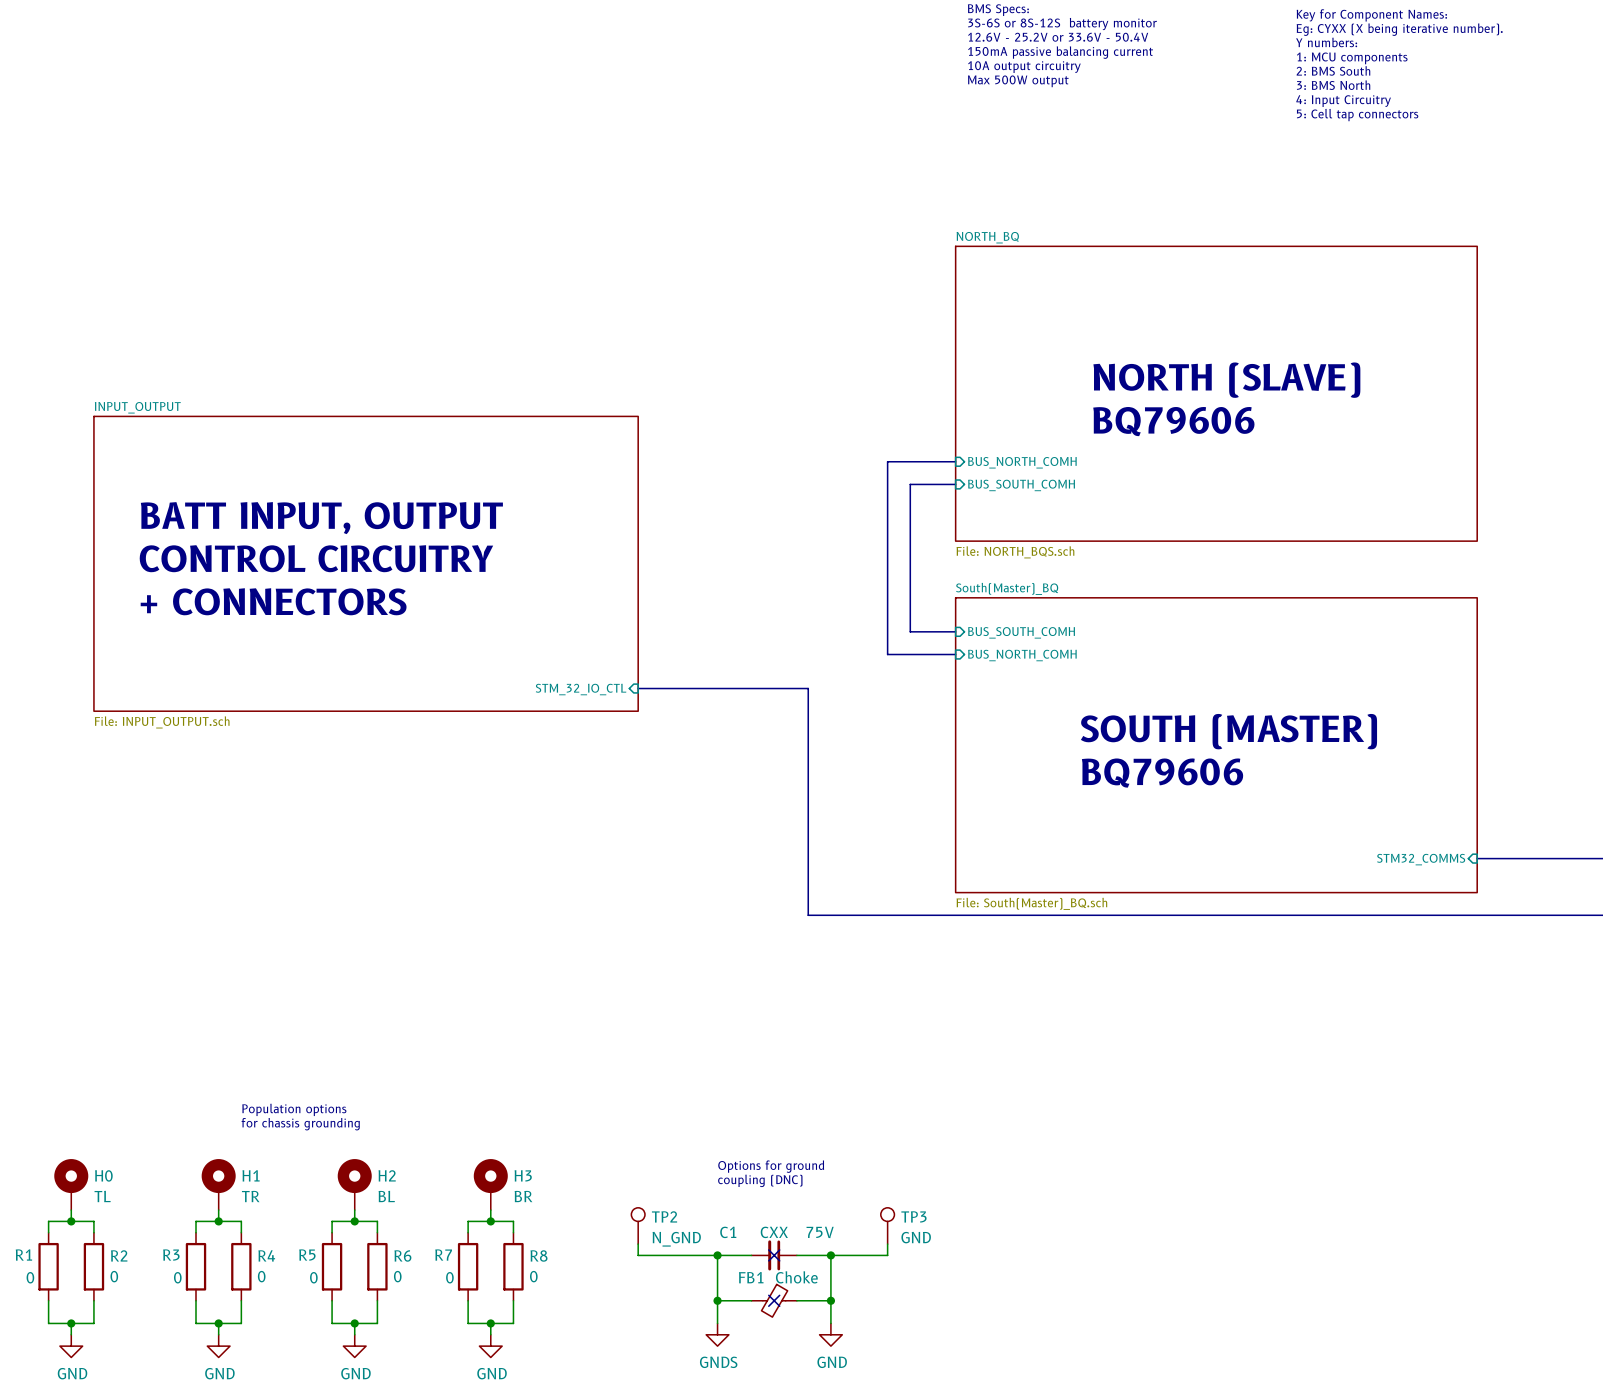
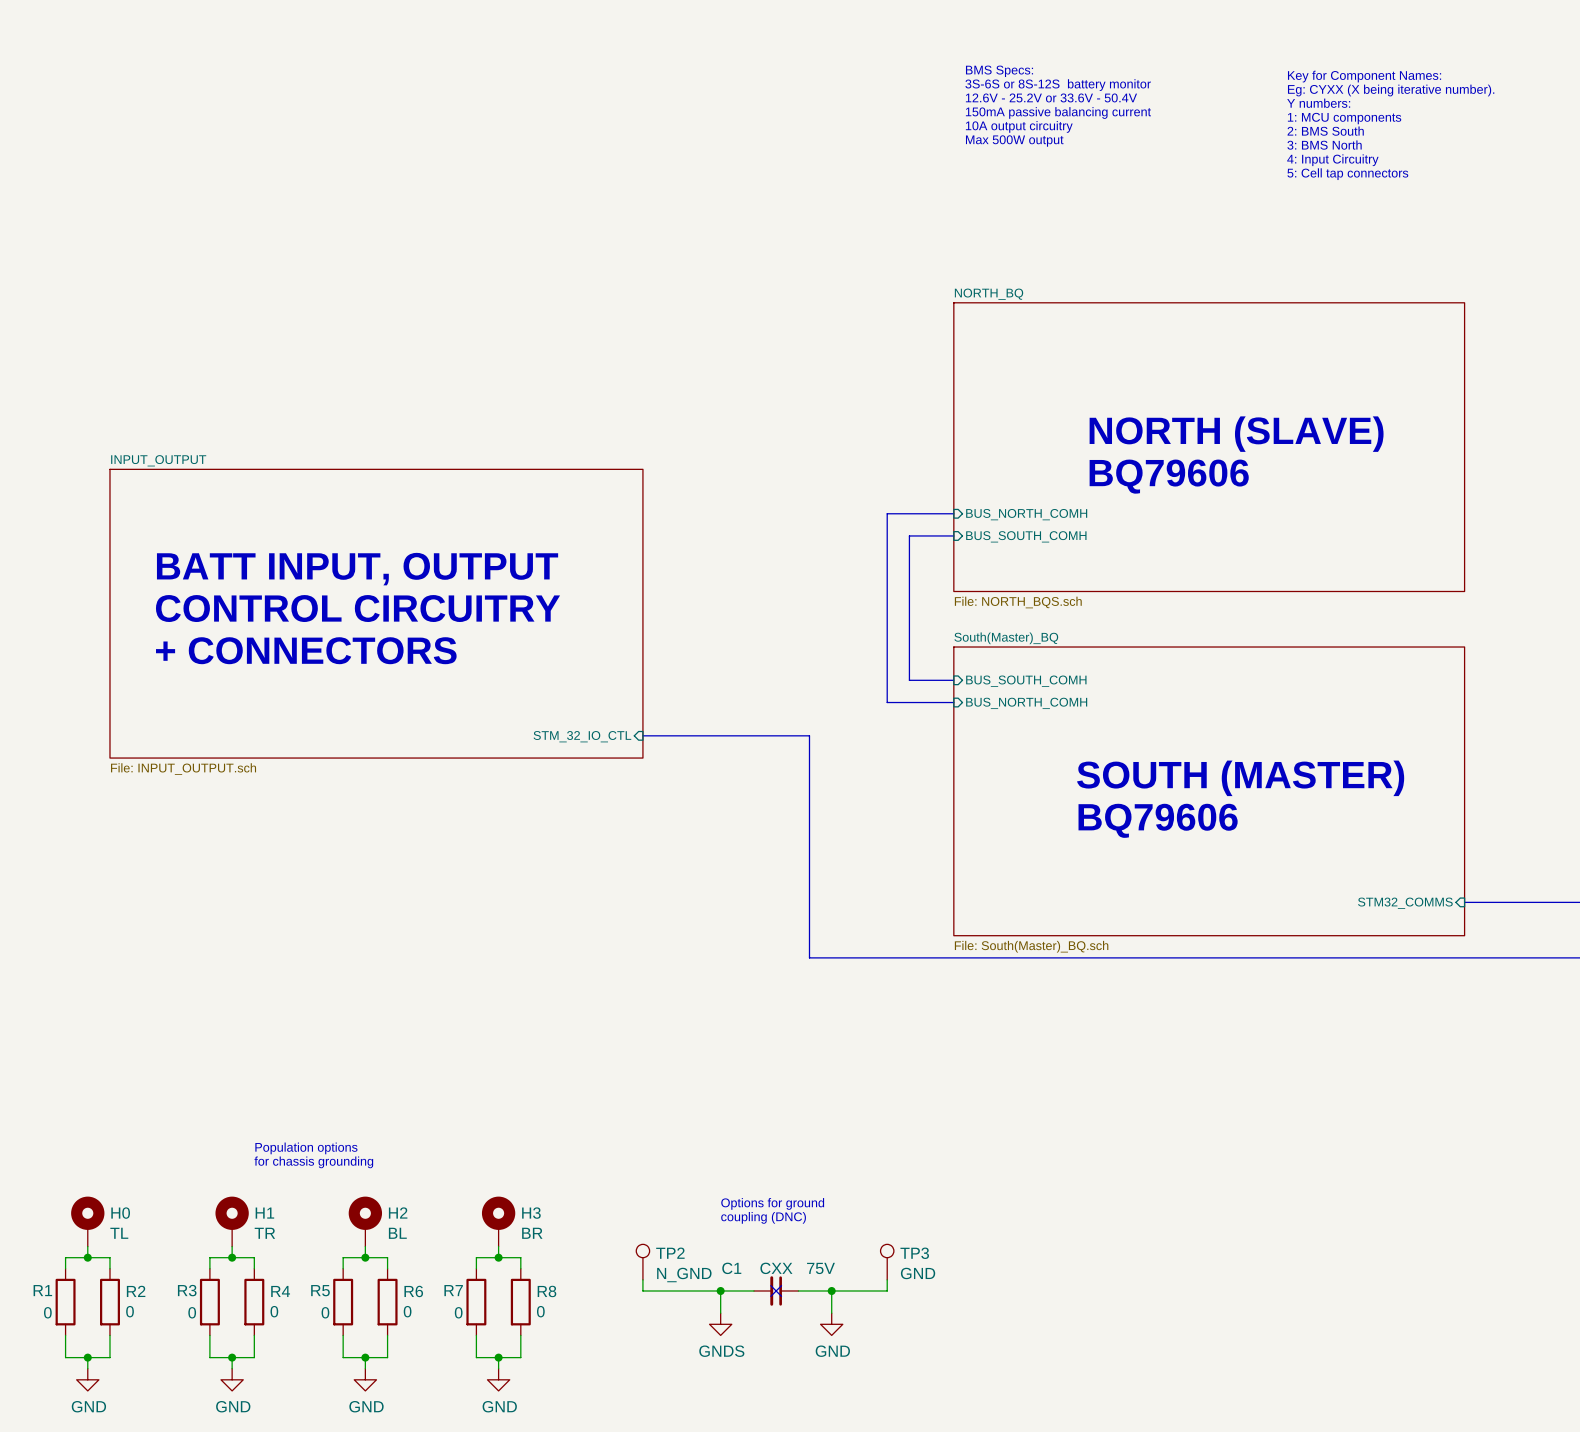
wire: (717, 1278) (717, 1323) -> none
wire: (830, 1278) (830, 1323) -> none
wire: (717, 1300) (751, 1300) -> none
junction: (717, 1300) -> none
no-connect mark: (774, 1300) -> none
FB1: Choke (774, 1300) -> none
wire: (796, 1300) (830, 1300) -> none
junction: (830, 1300) -> none
power symbol position: GNDS (717, 1334) -> GNDS (720, 1324)
power symbol position: GND (830, 1334) -> GND (831, 1324)

